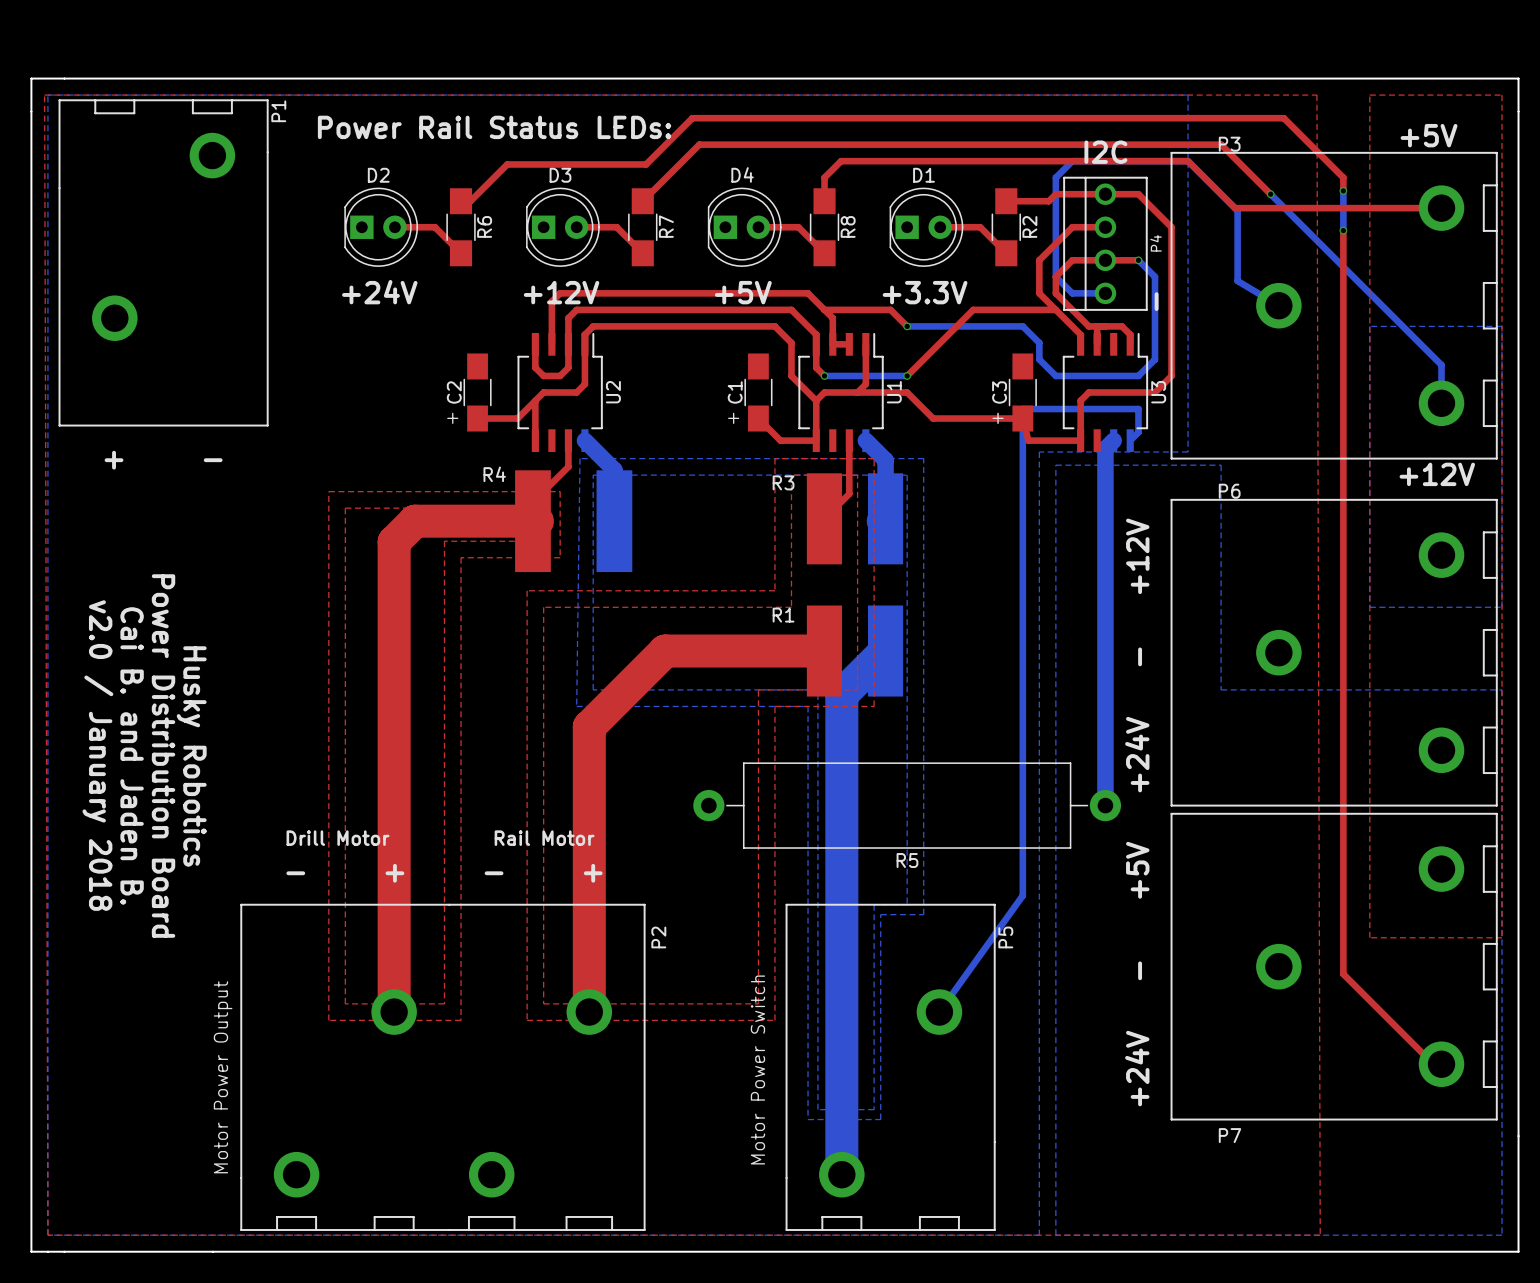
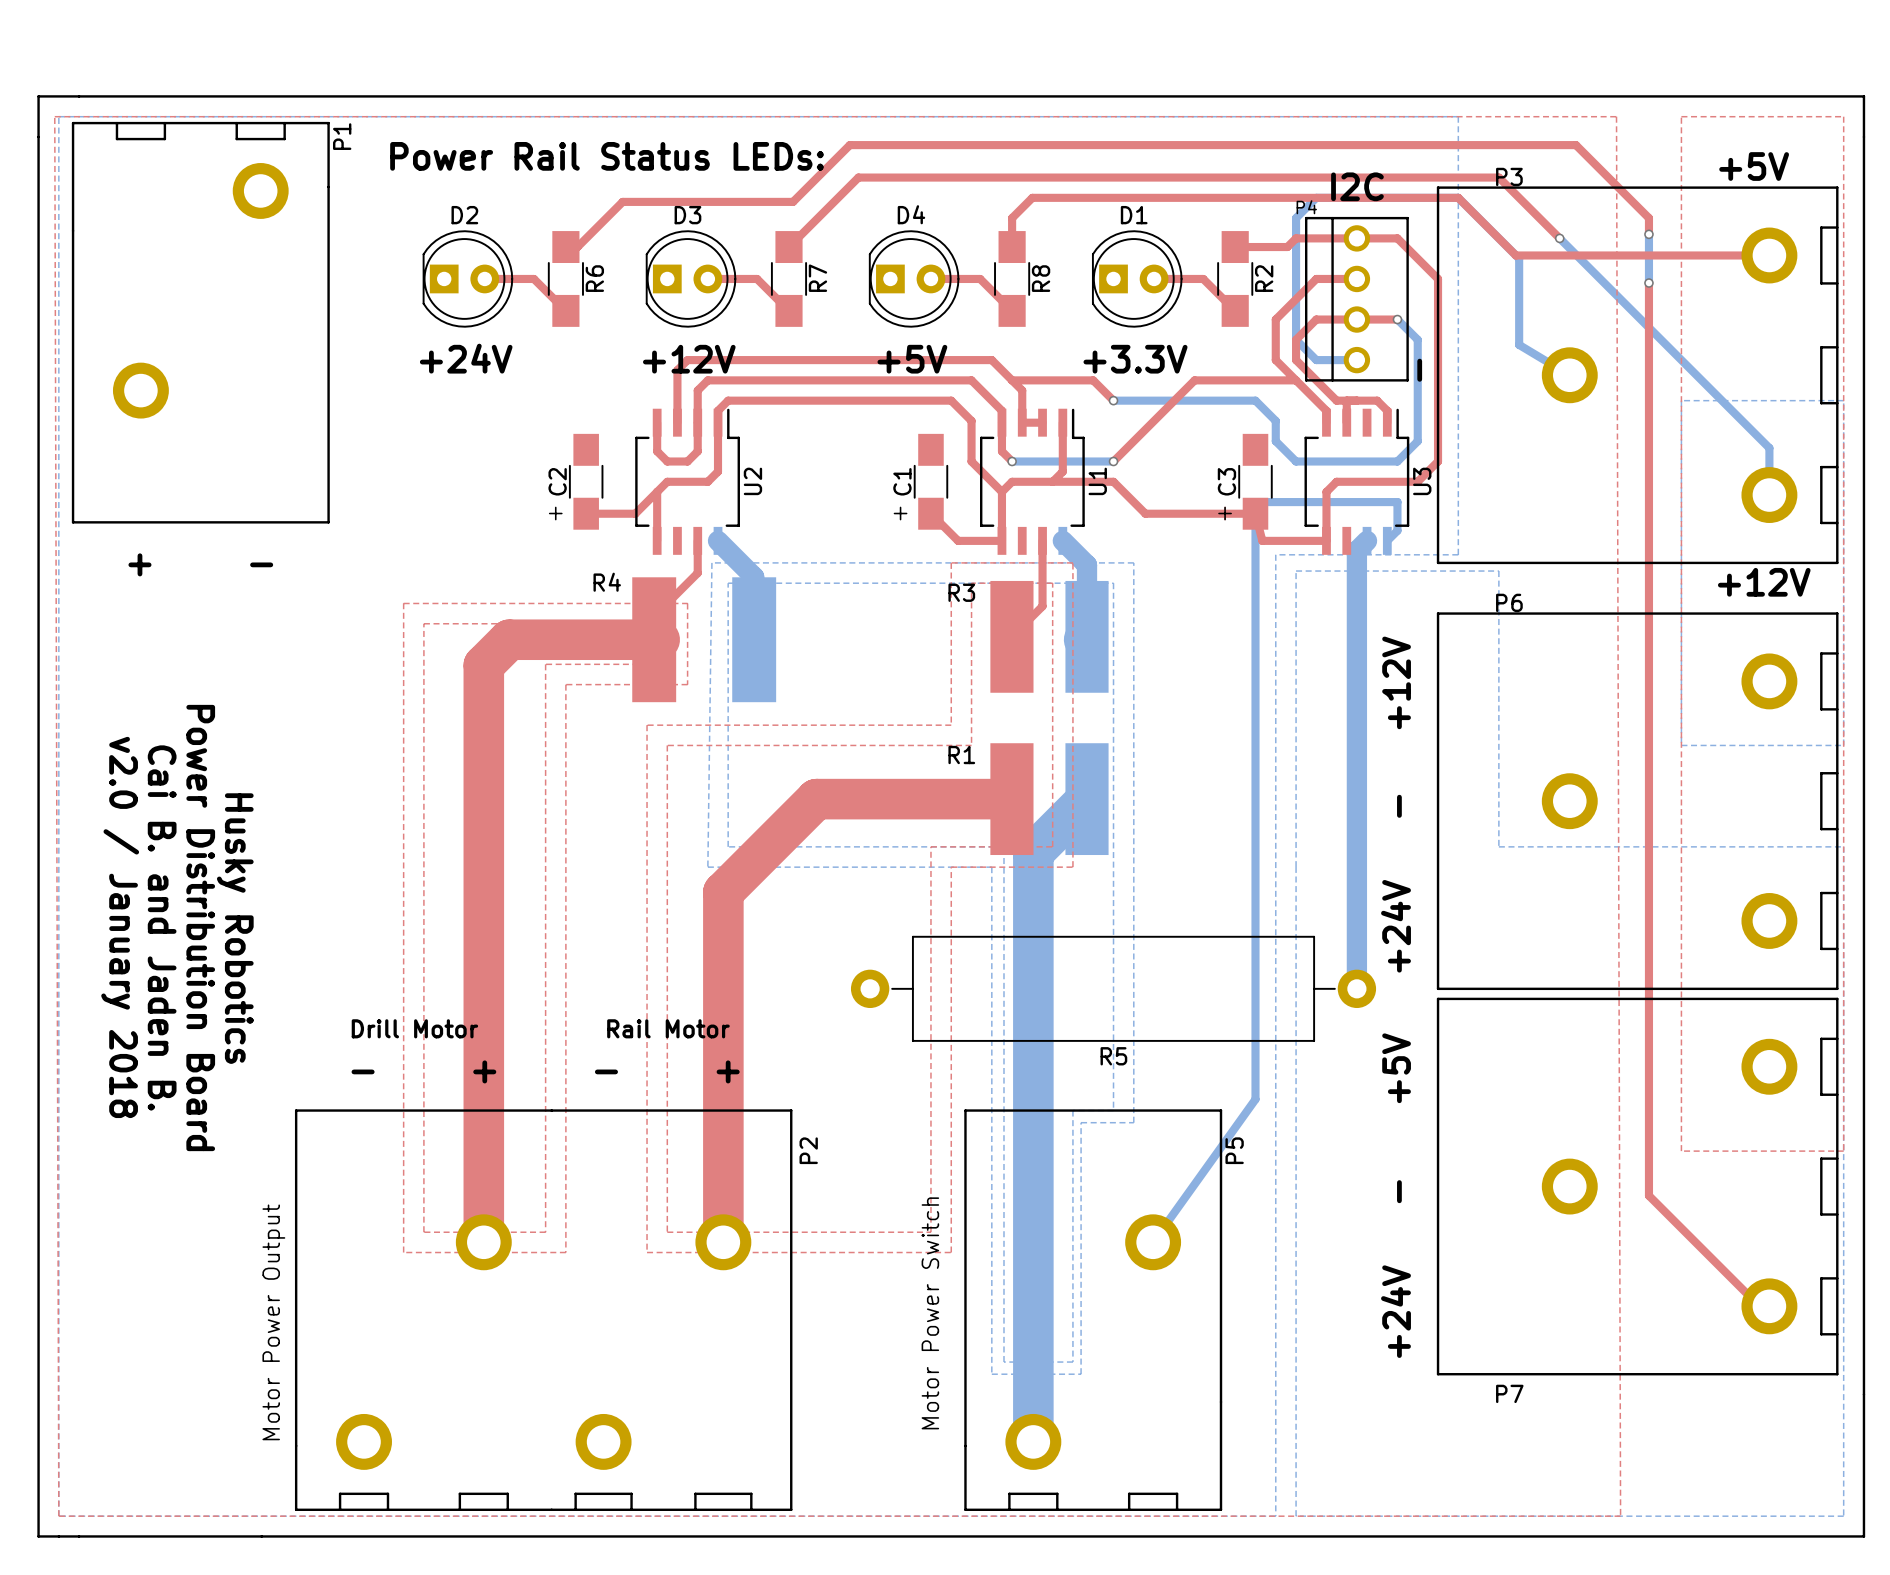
P4 name rotation: 0° (1156, 243) -> 90° clockwise (1306, 207)
P4 name position: P4 (1156, 243) -> P4 (1306, 207)

